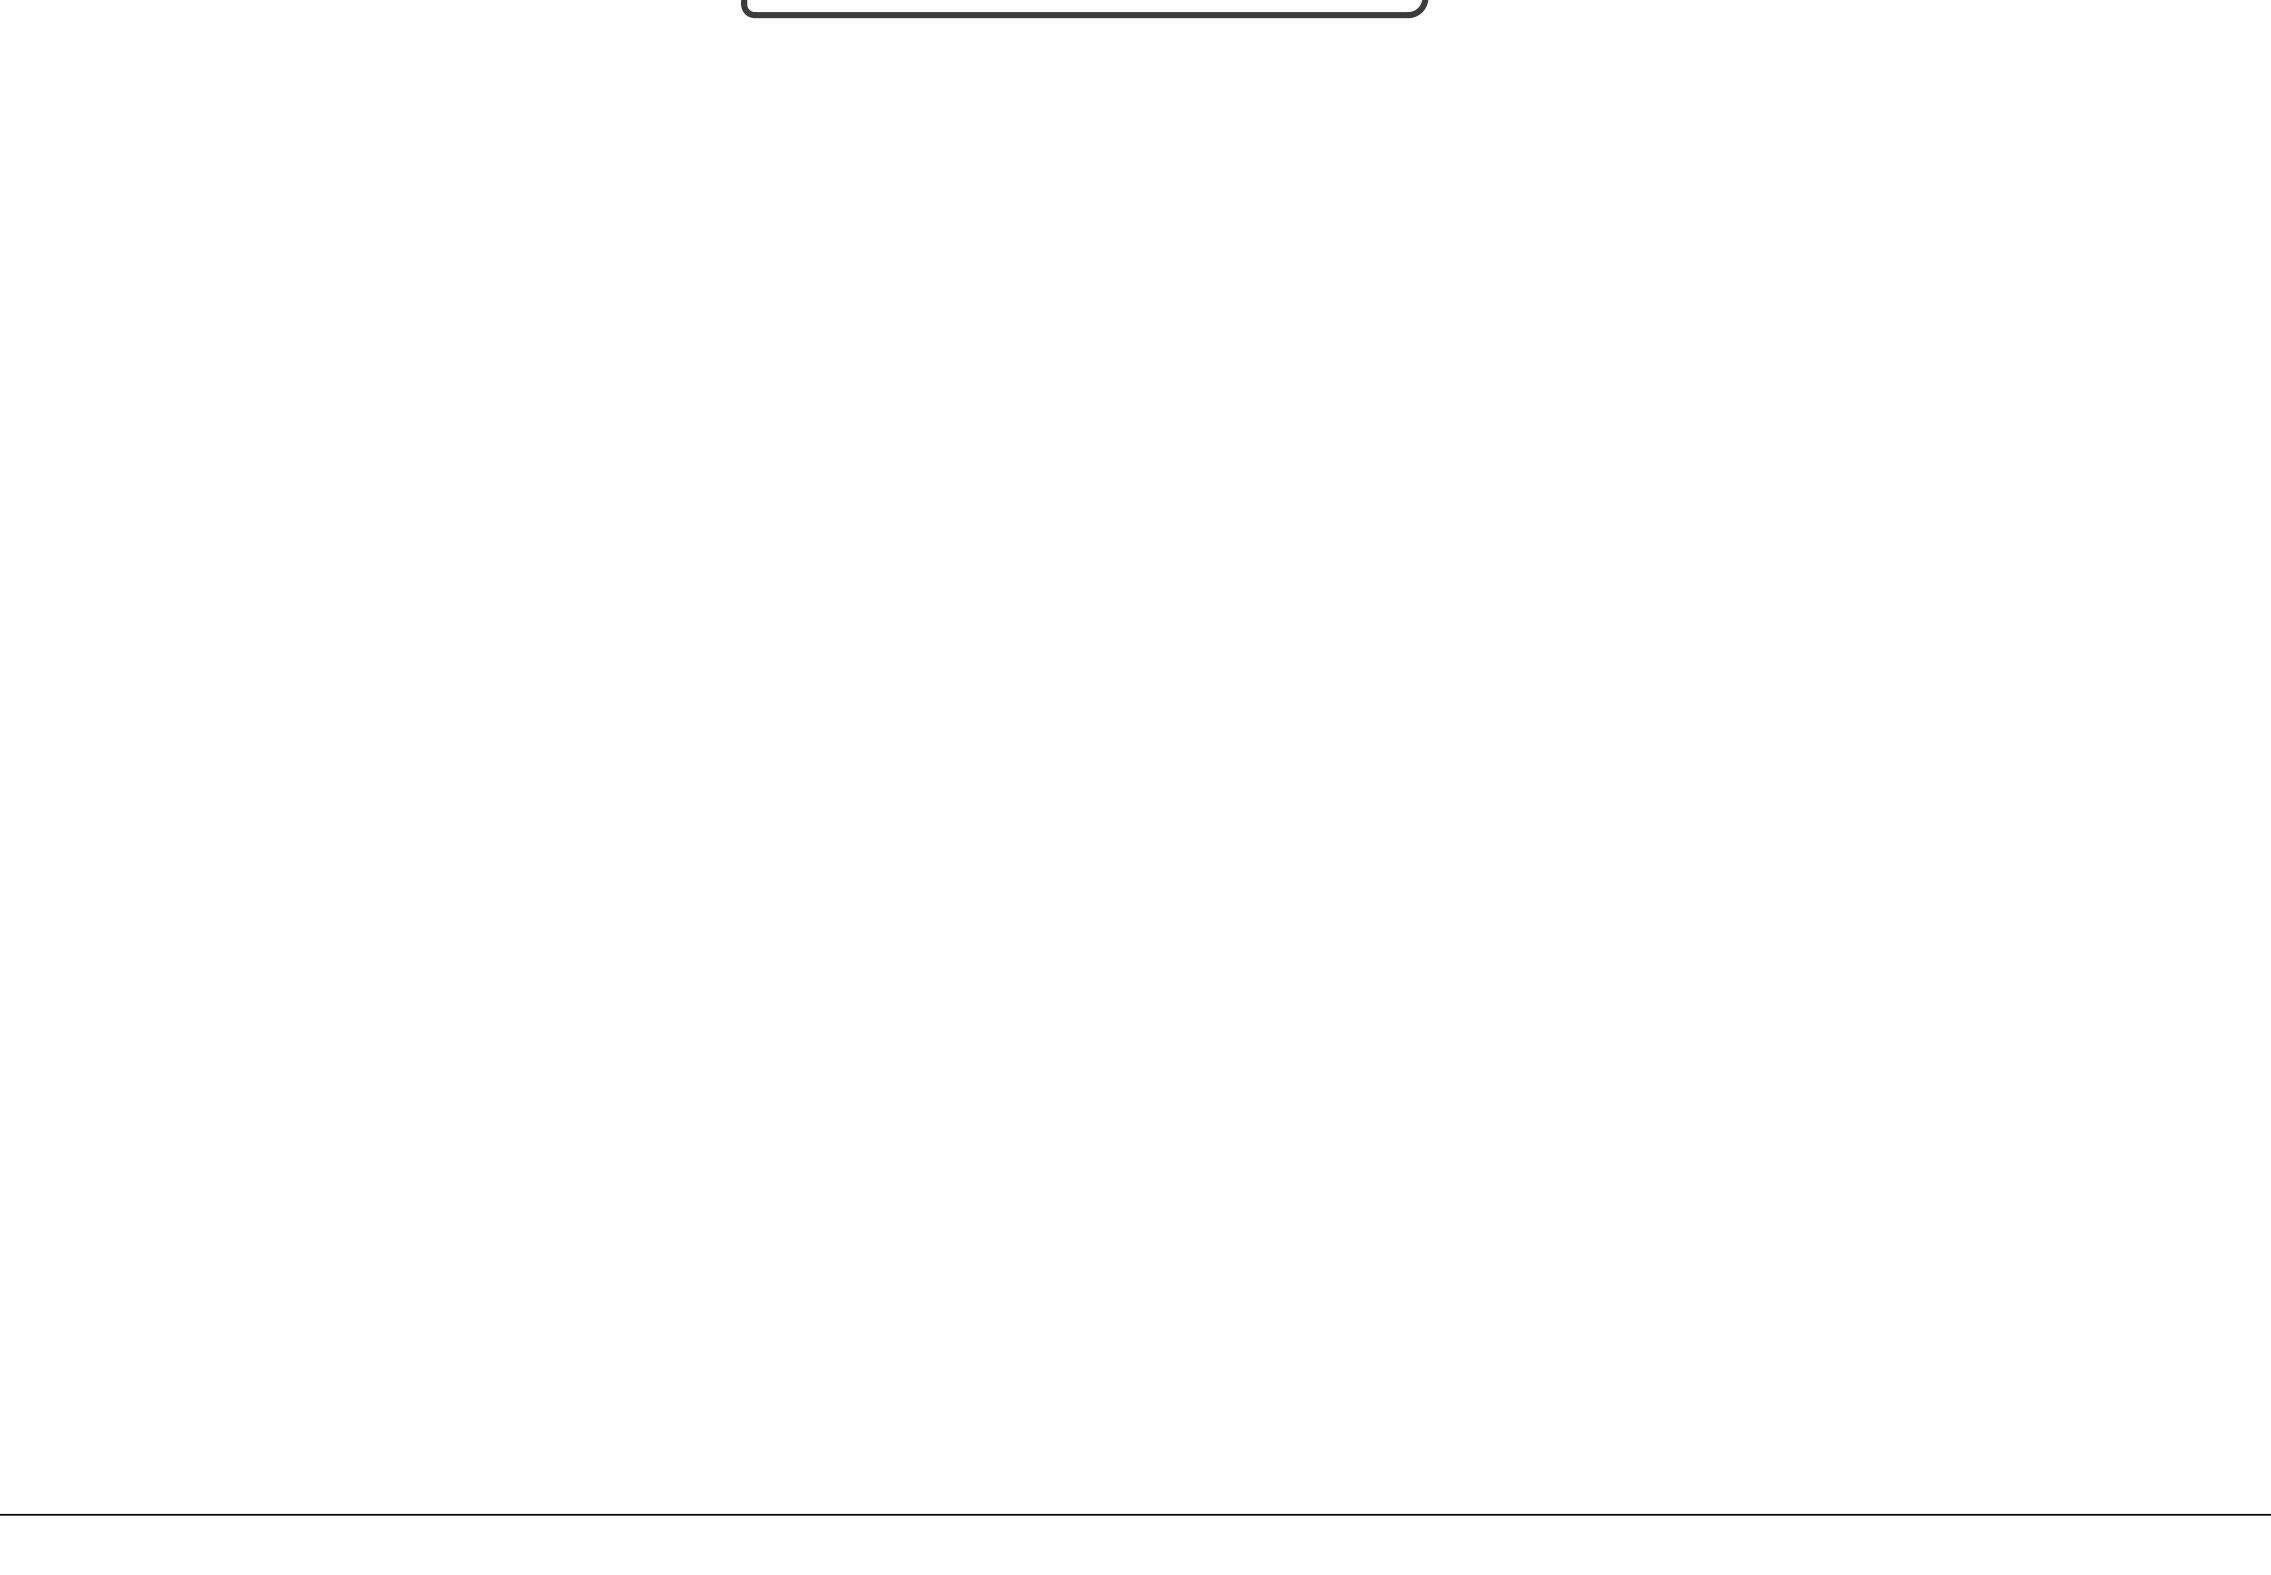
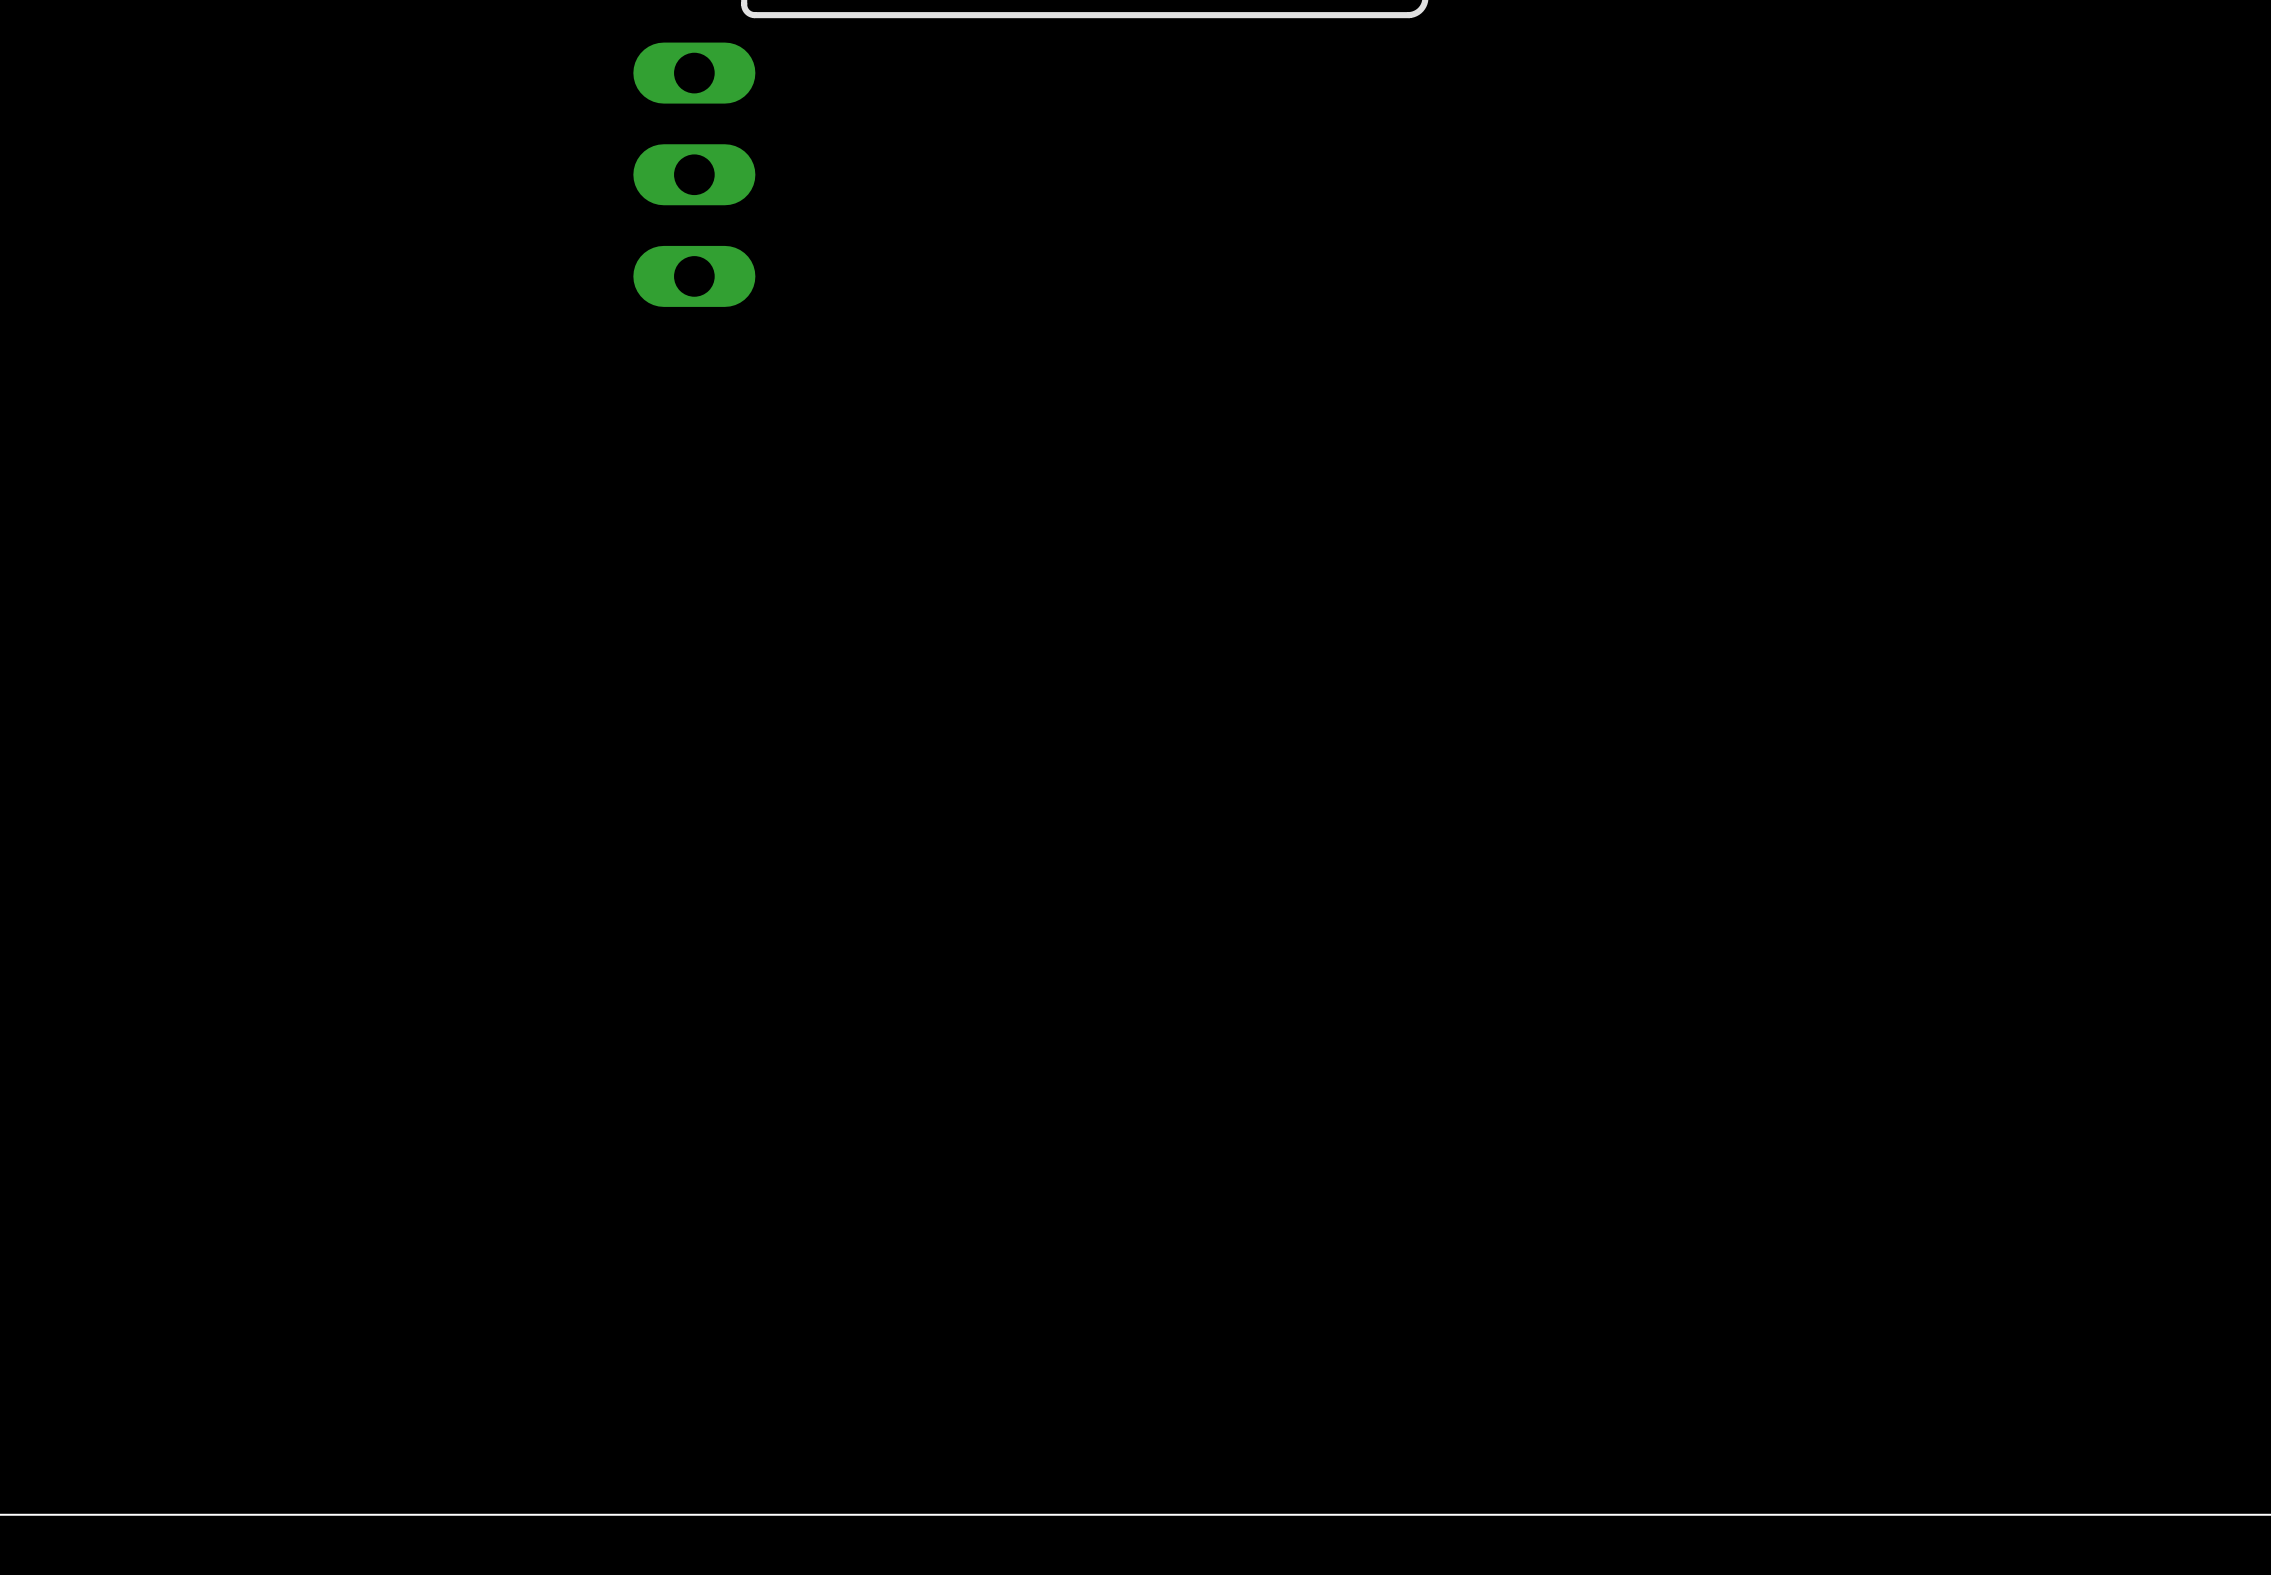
part: none -> (694, 174)

